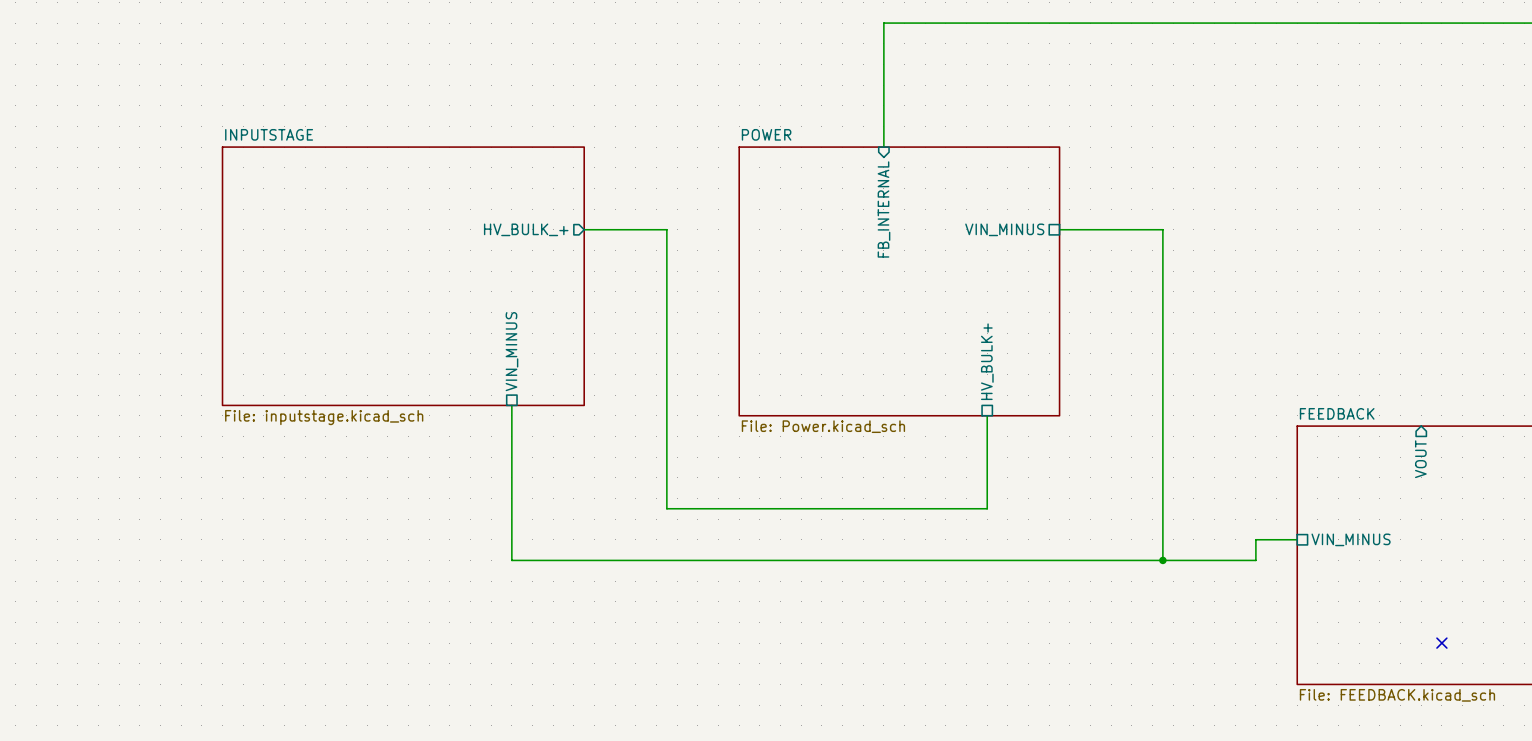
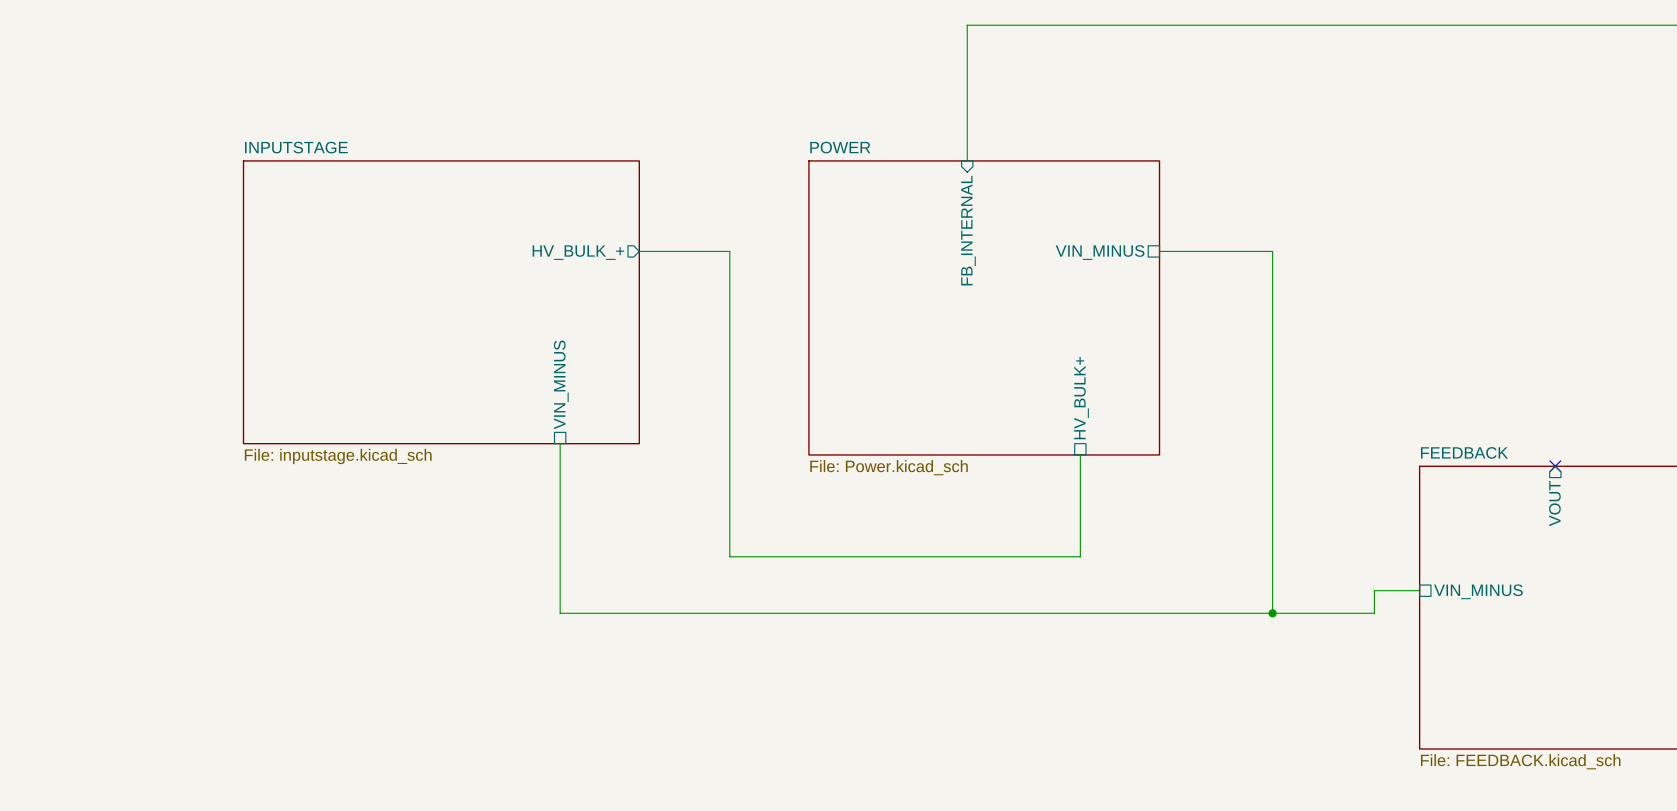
no-connect mark: none -> (1555, 466)
no-connect mark: (1441, 643) -> none

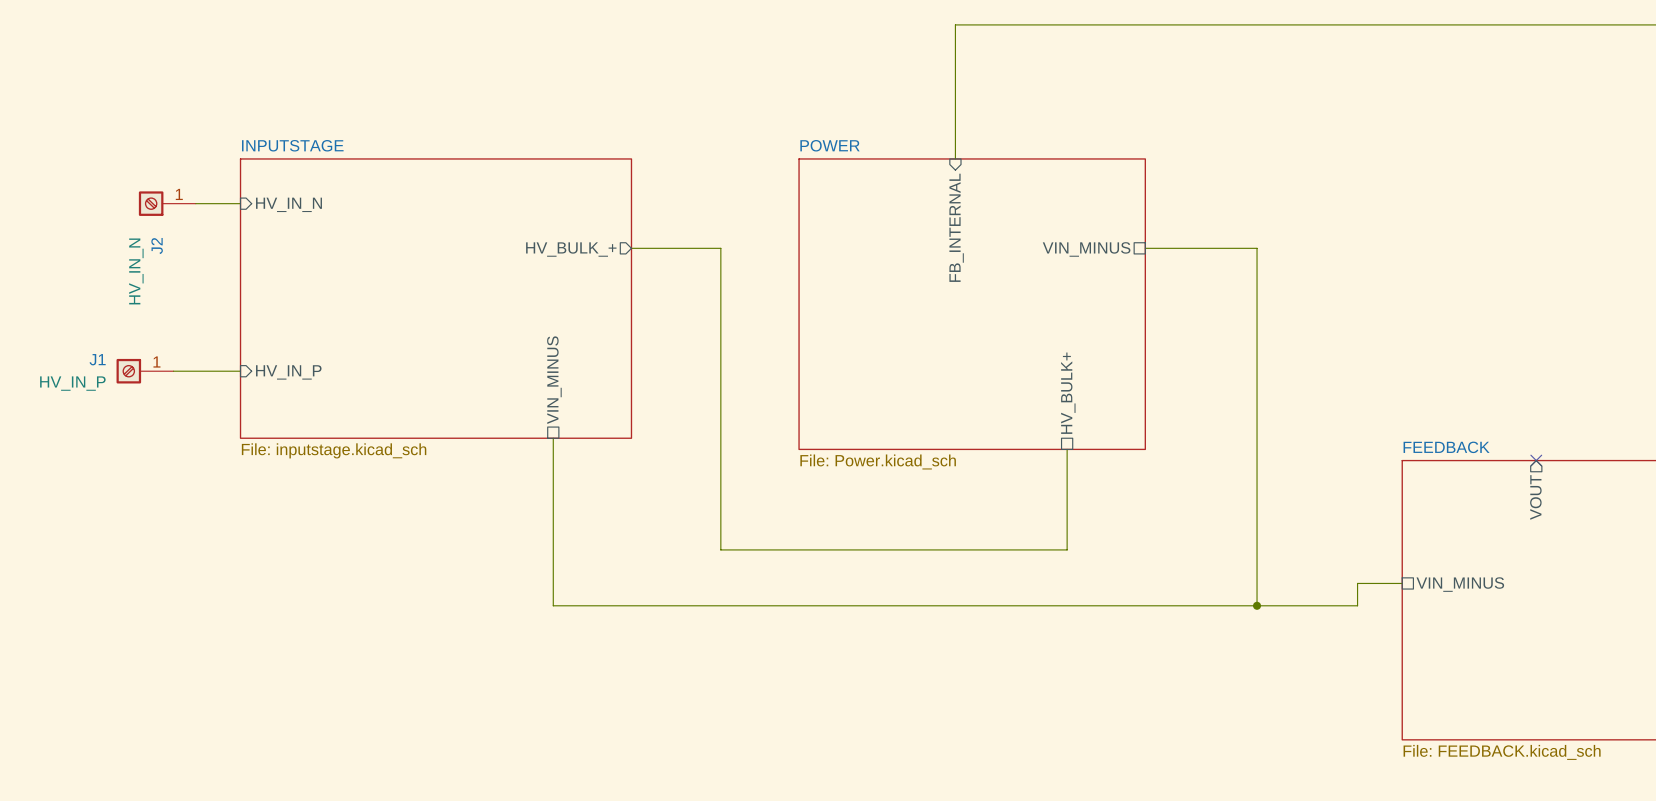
J2: none -> HV_IN_N (167, 203)
wire: none -> (195, 203) (240, 203)
sheet pin: none -> HV_IN_N (289, 204)
J1: none -> HV_IN_P (145, 371)
wire: none -> (173, 371) (240, 371)
sheet pin: none -> HV_IN_P (288, 372)

